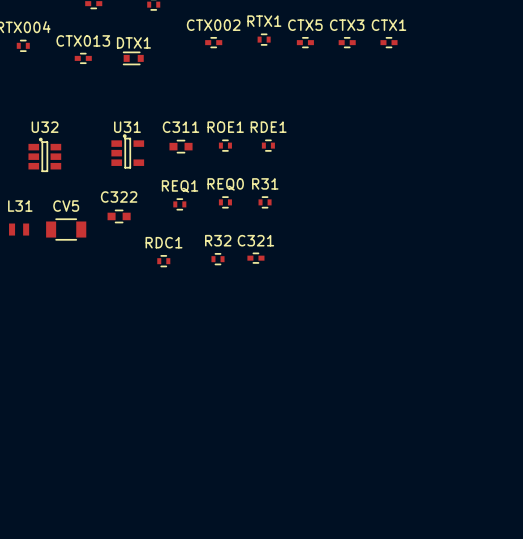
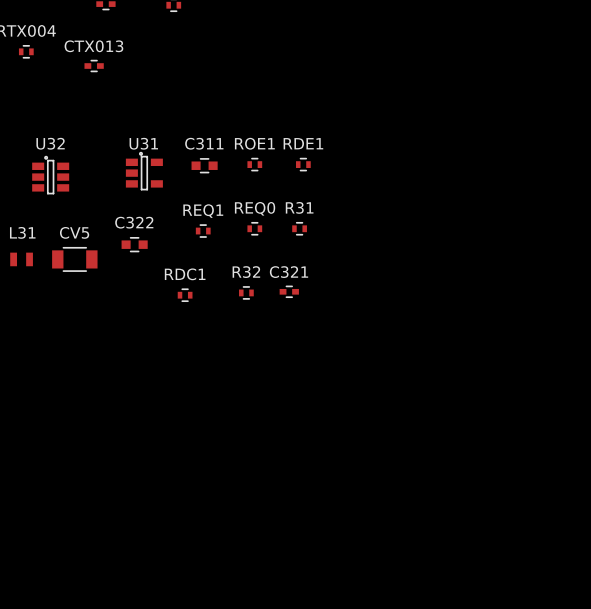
RTX1: (264, 39) -> none
CTX002: (213, 42) -> none
CTX5: (305, 42) -> none
CTX3: (347, 42) -> none
CTX1: (389, 42) -> none
DTX1: (133, 58) -> none

